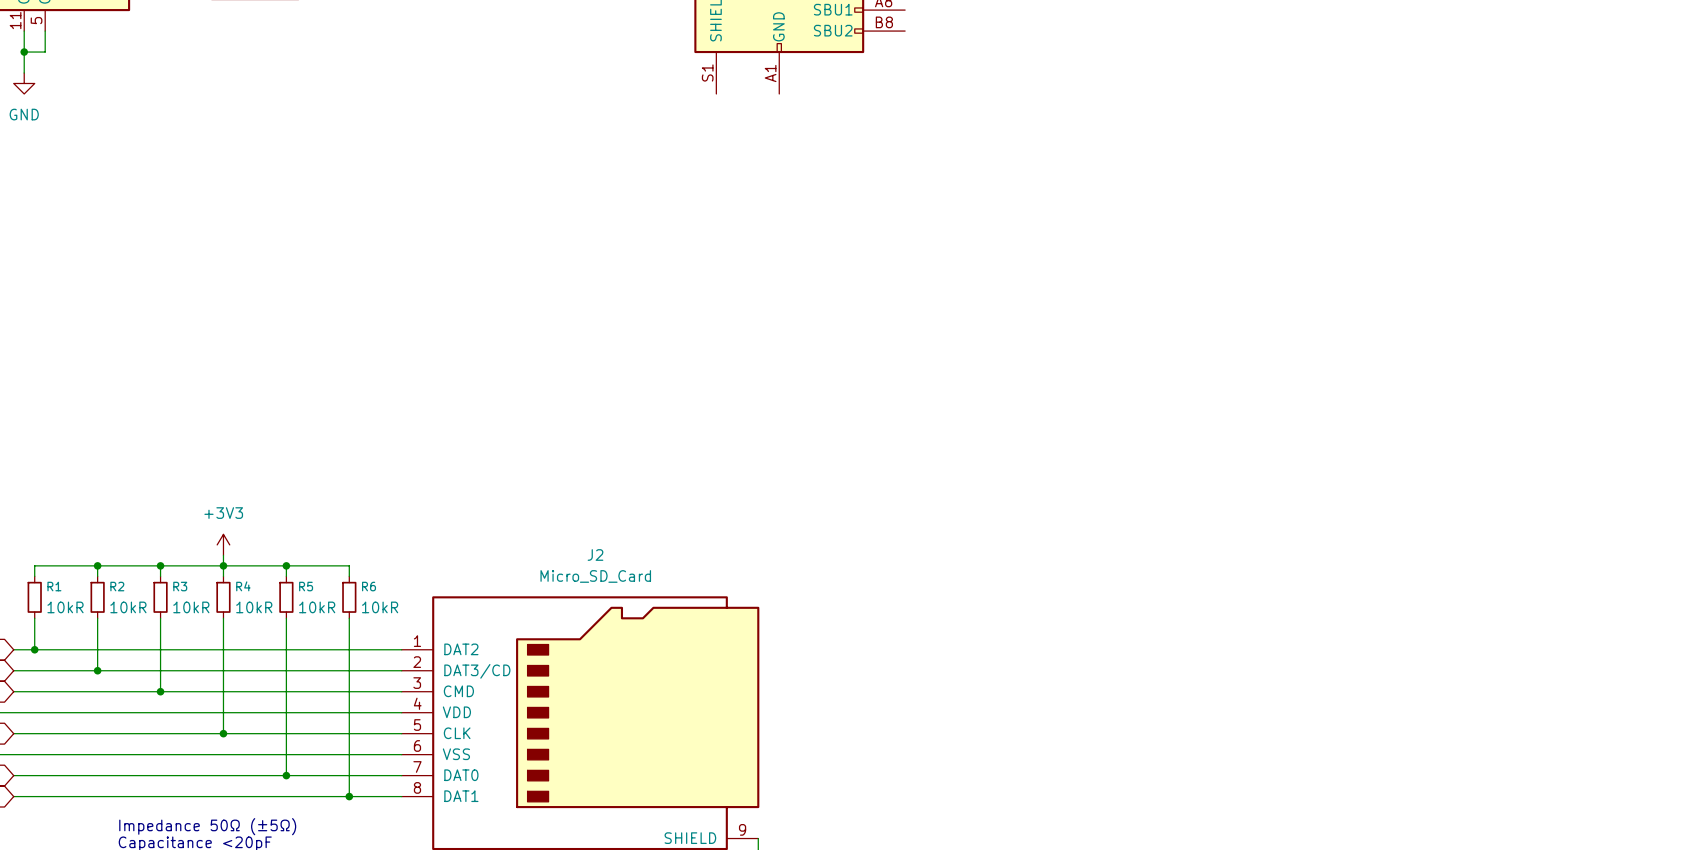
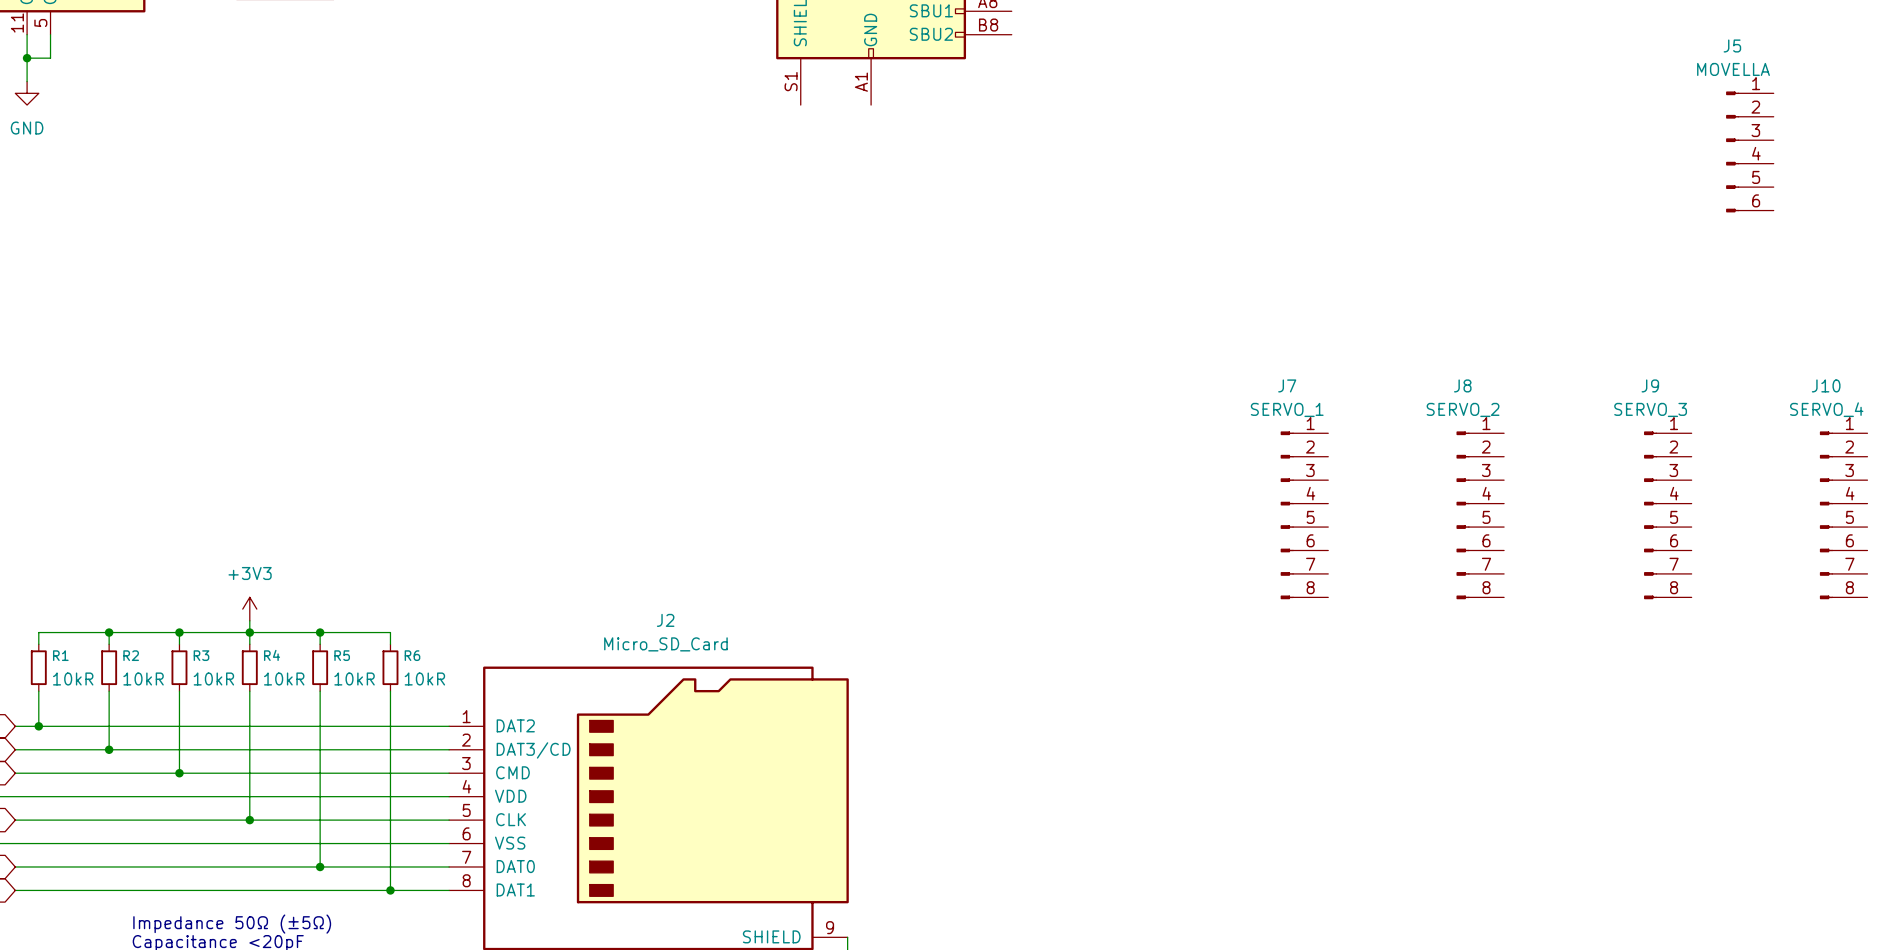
J5: none -> MOVELLA (1749, 151)
J7: none -> SERVO_1 (1304, 515)
J8: none -> SERVO_2 (1480, 515)
J9: none -> SERVO_3 (1667, 515)
J10: none -> SERVO_4 (1843, 515)

